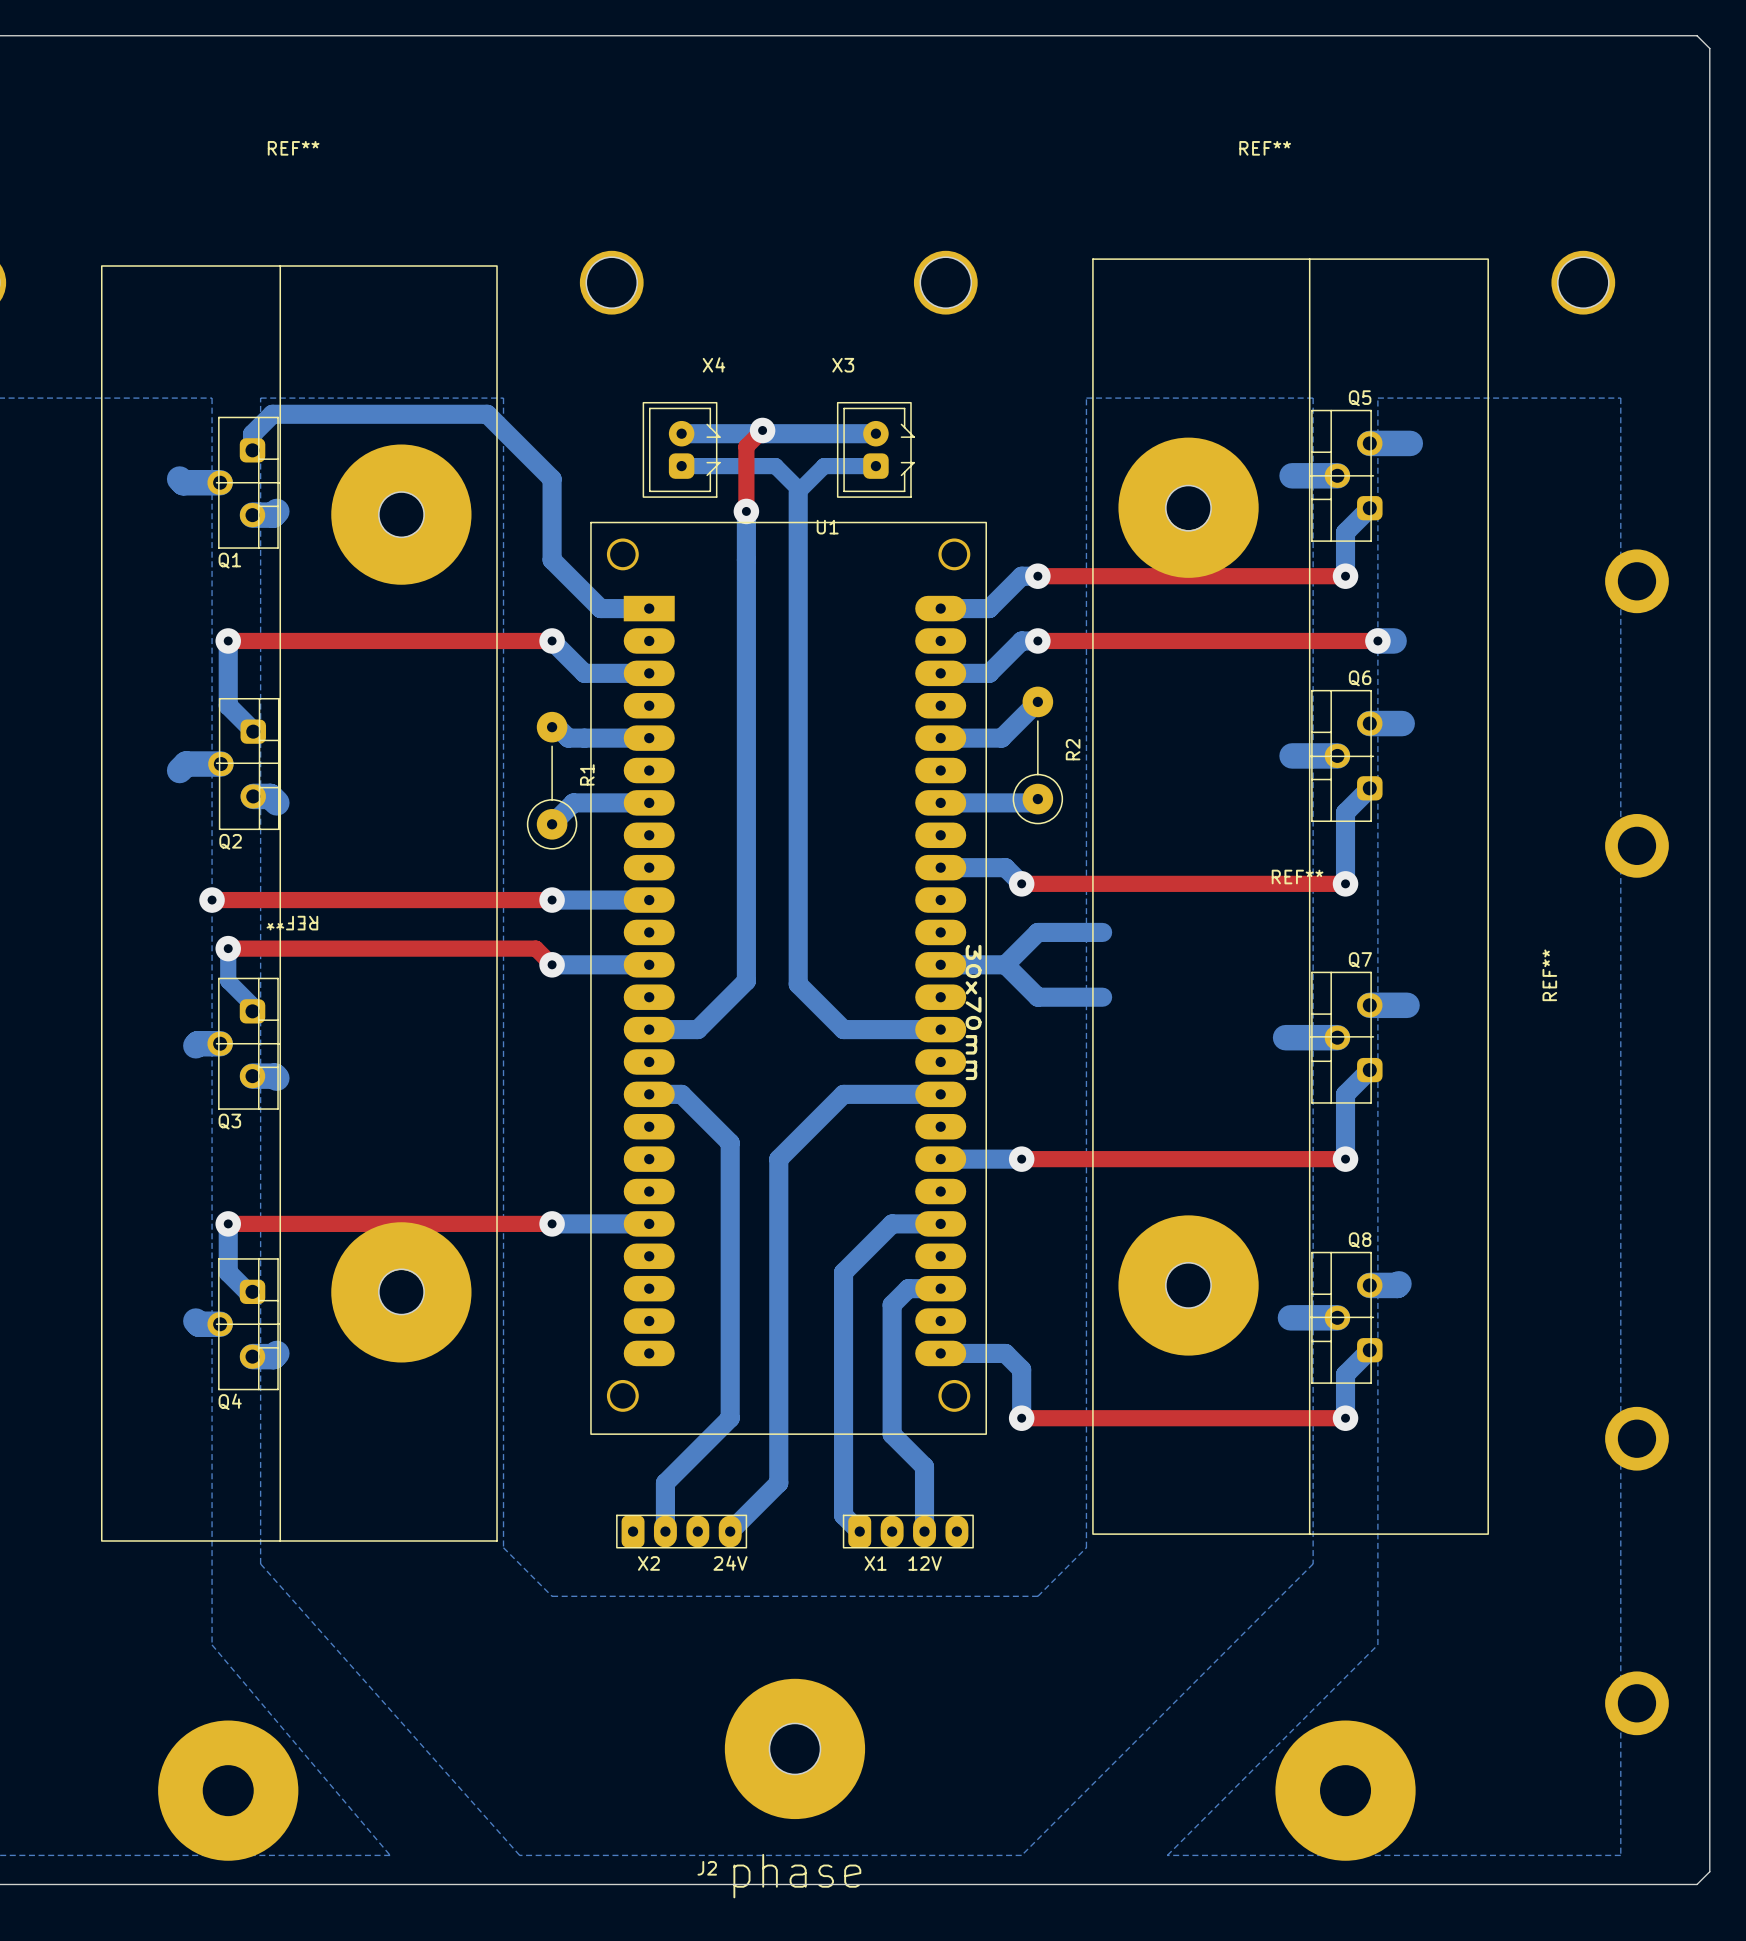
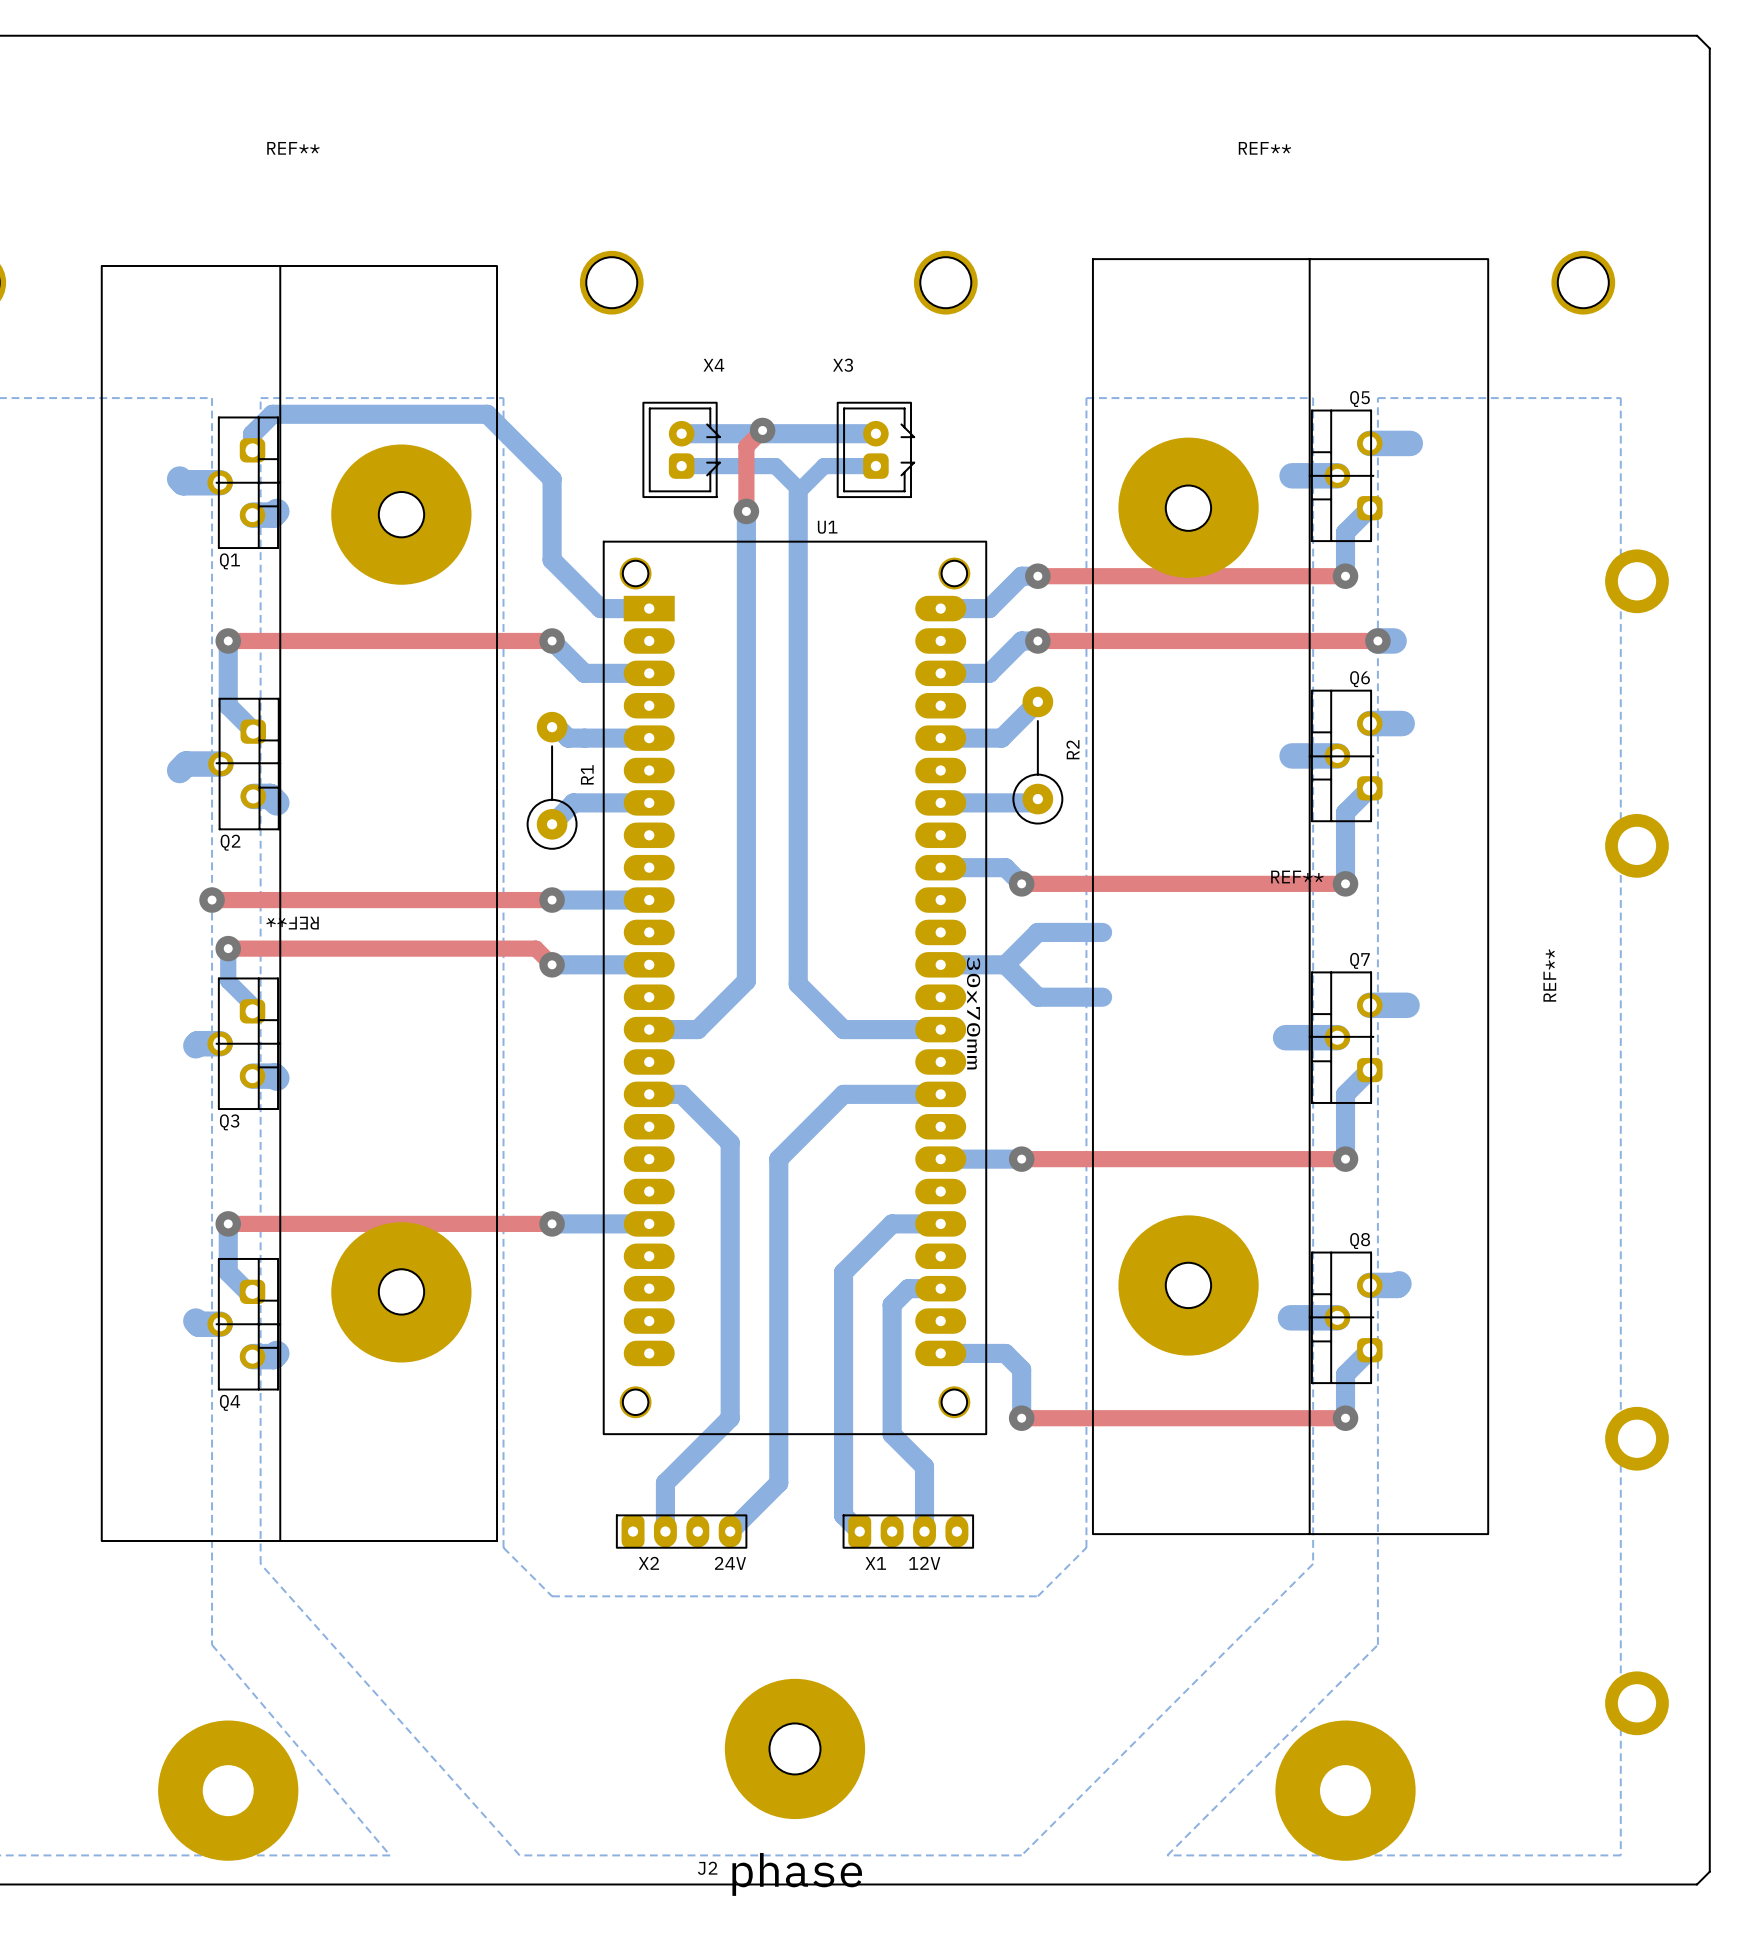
U1 footprint: [590, 521, 987, 1435] -> [602, 540, 987, 1435]

